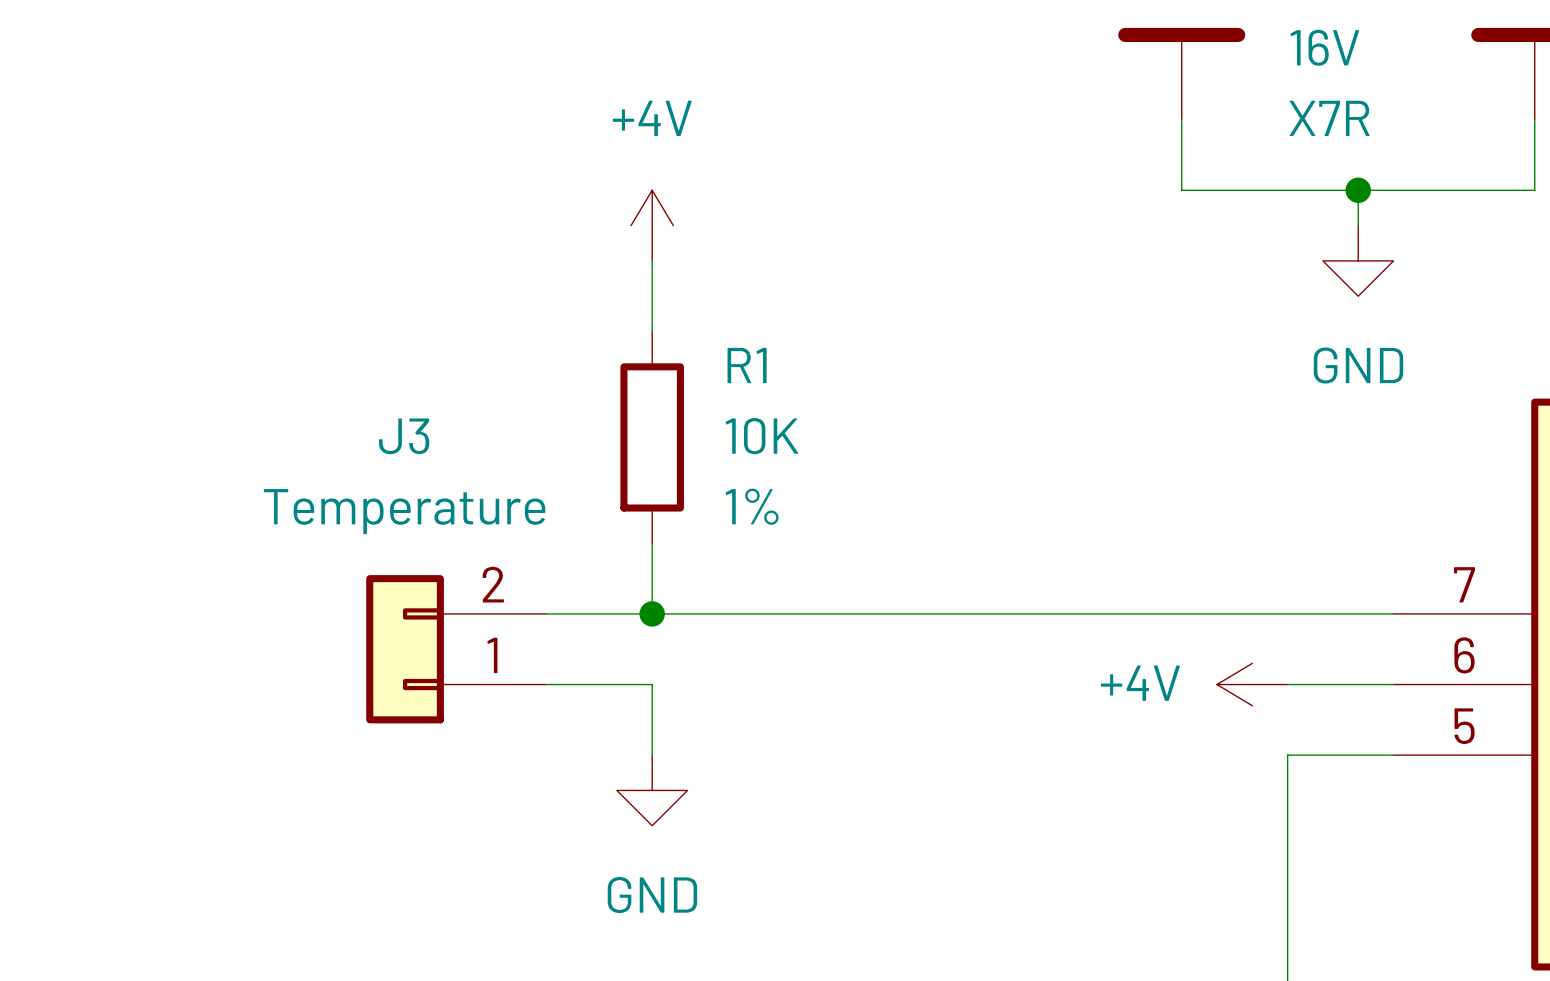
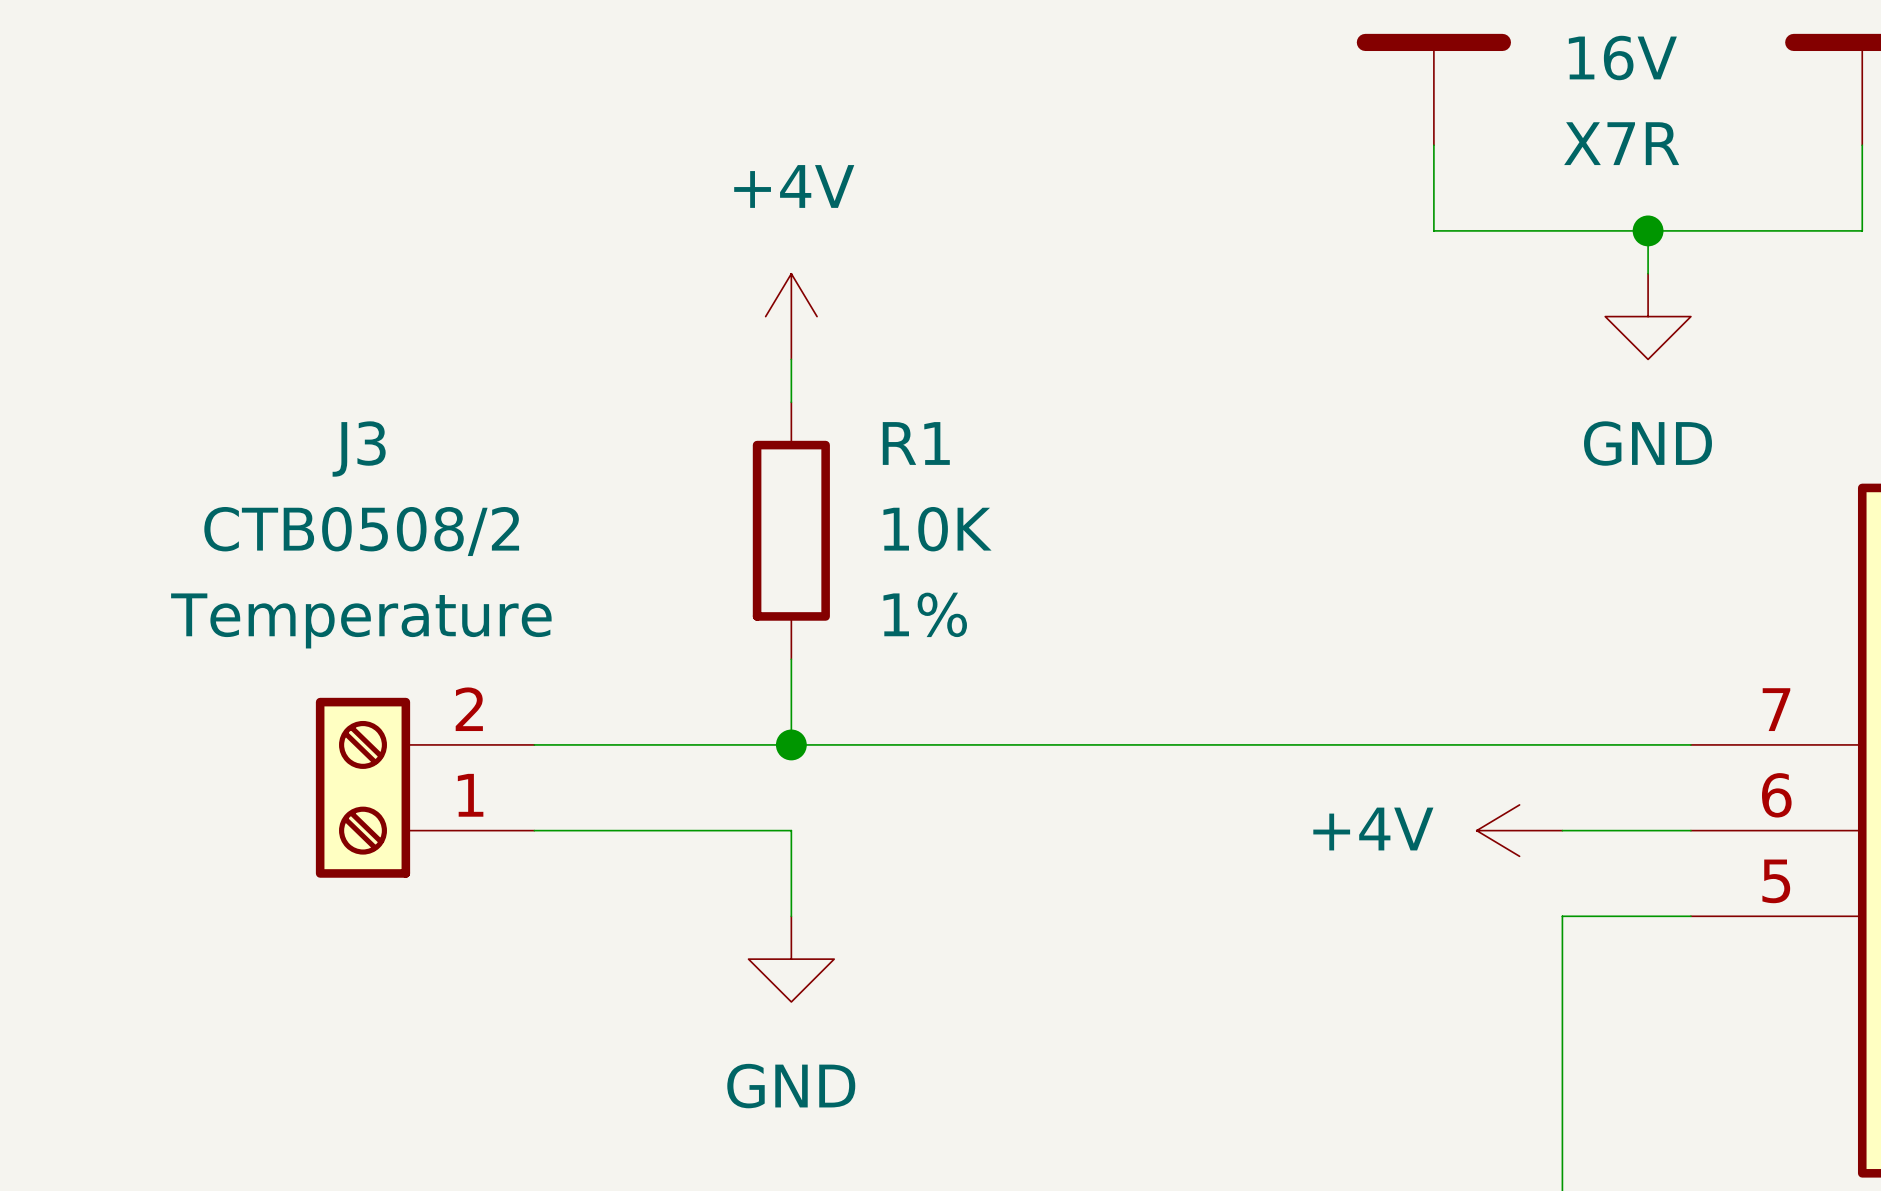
power symbol position: +4V (652, 225) -> +4V (791, 316)
J3 name position: J3 (404, 436) -> J3 (359, 448)
J3 text: none -> Temperature (361, 620)
J3 value: Temperature (404, 511) -> CTB0508/2 (361, 531)
J3 symbol: [366, 575, 547, 724] -> [315, 697, 535, 878]

